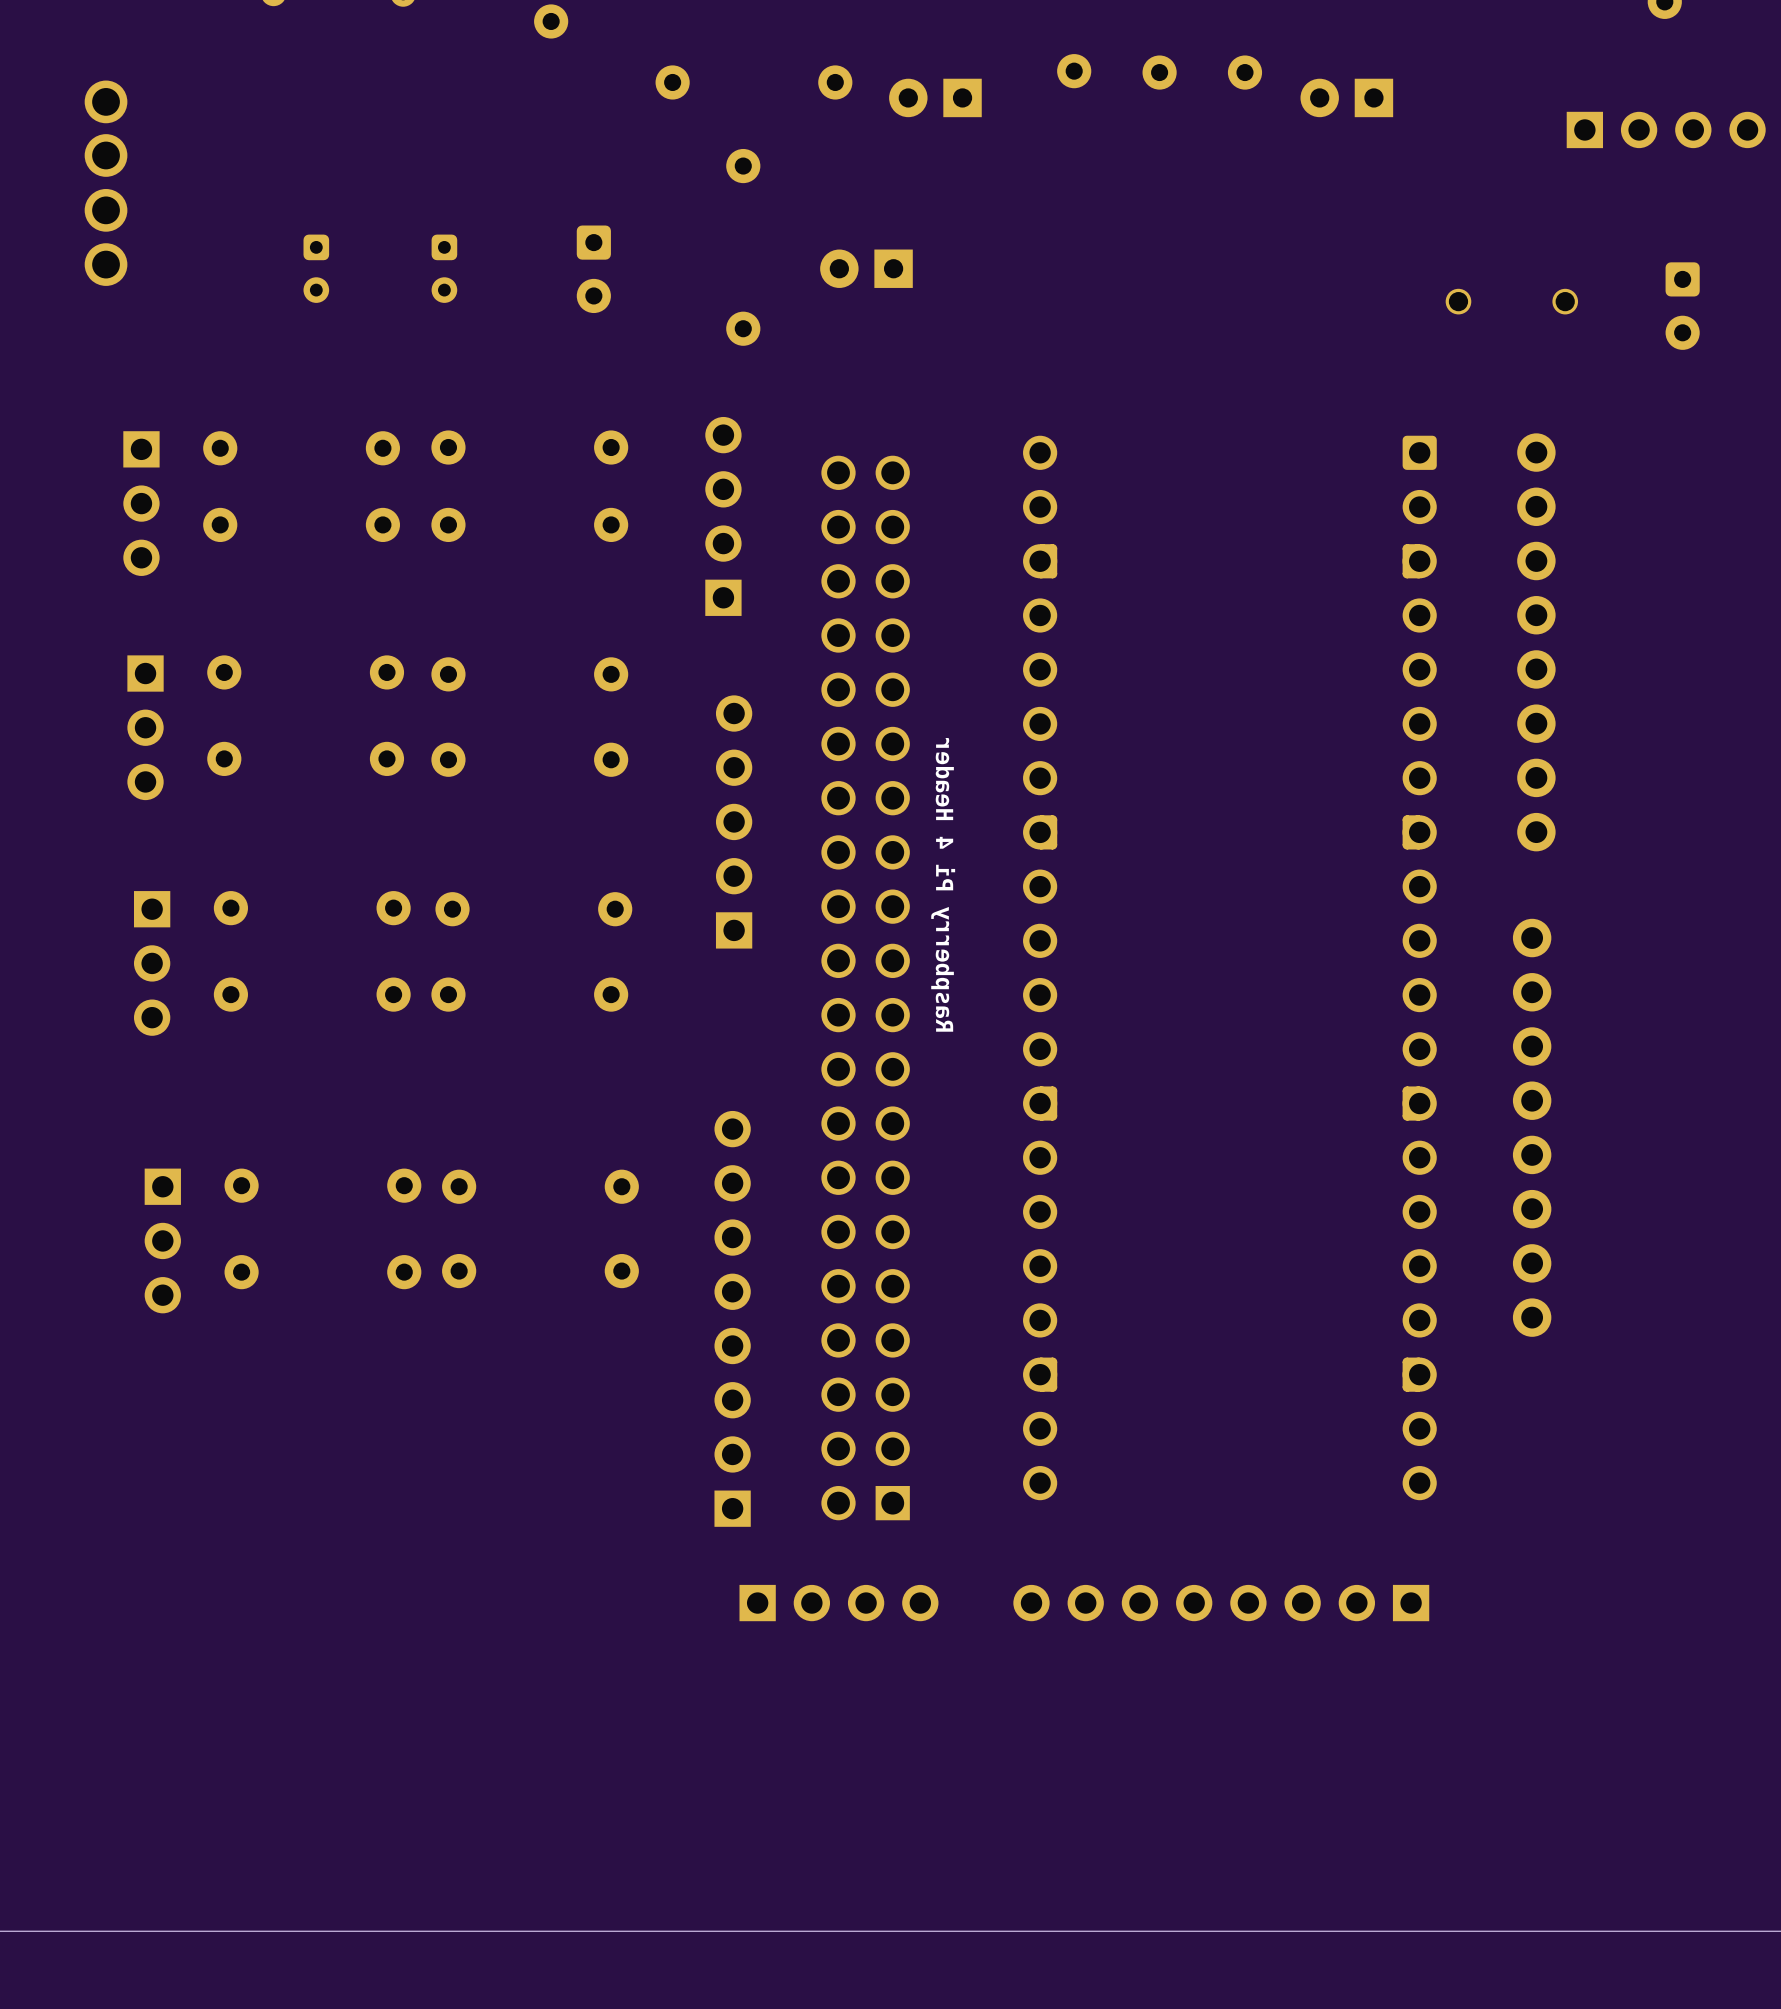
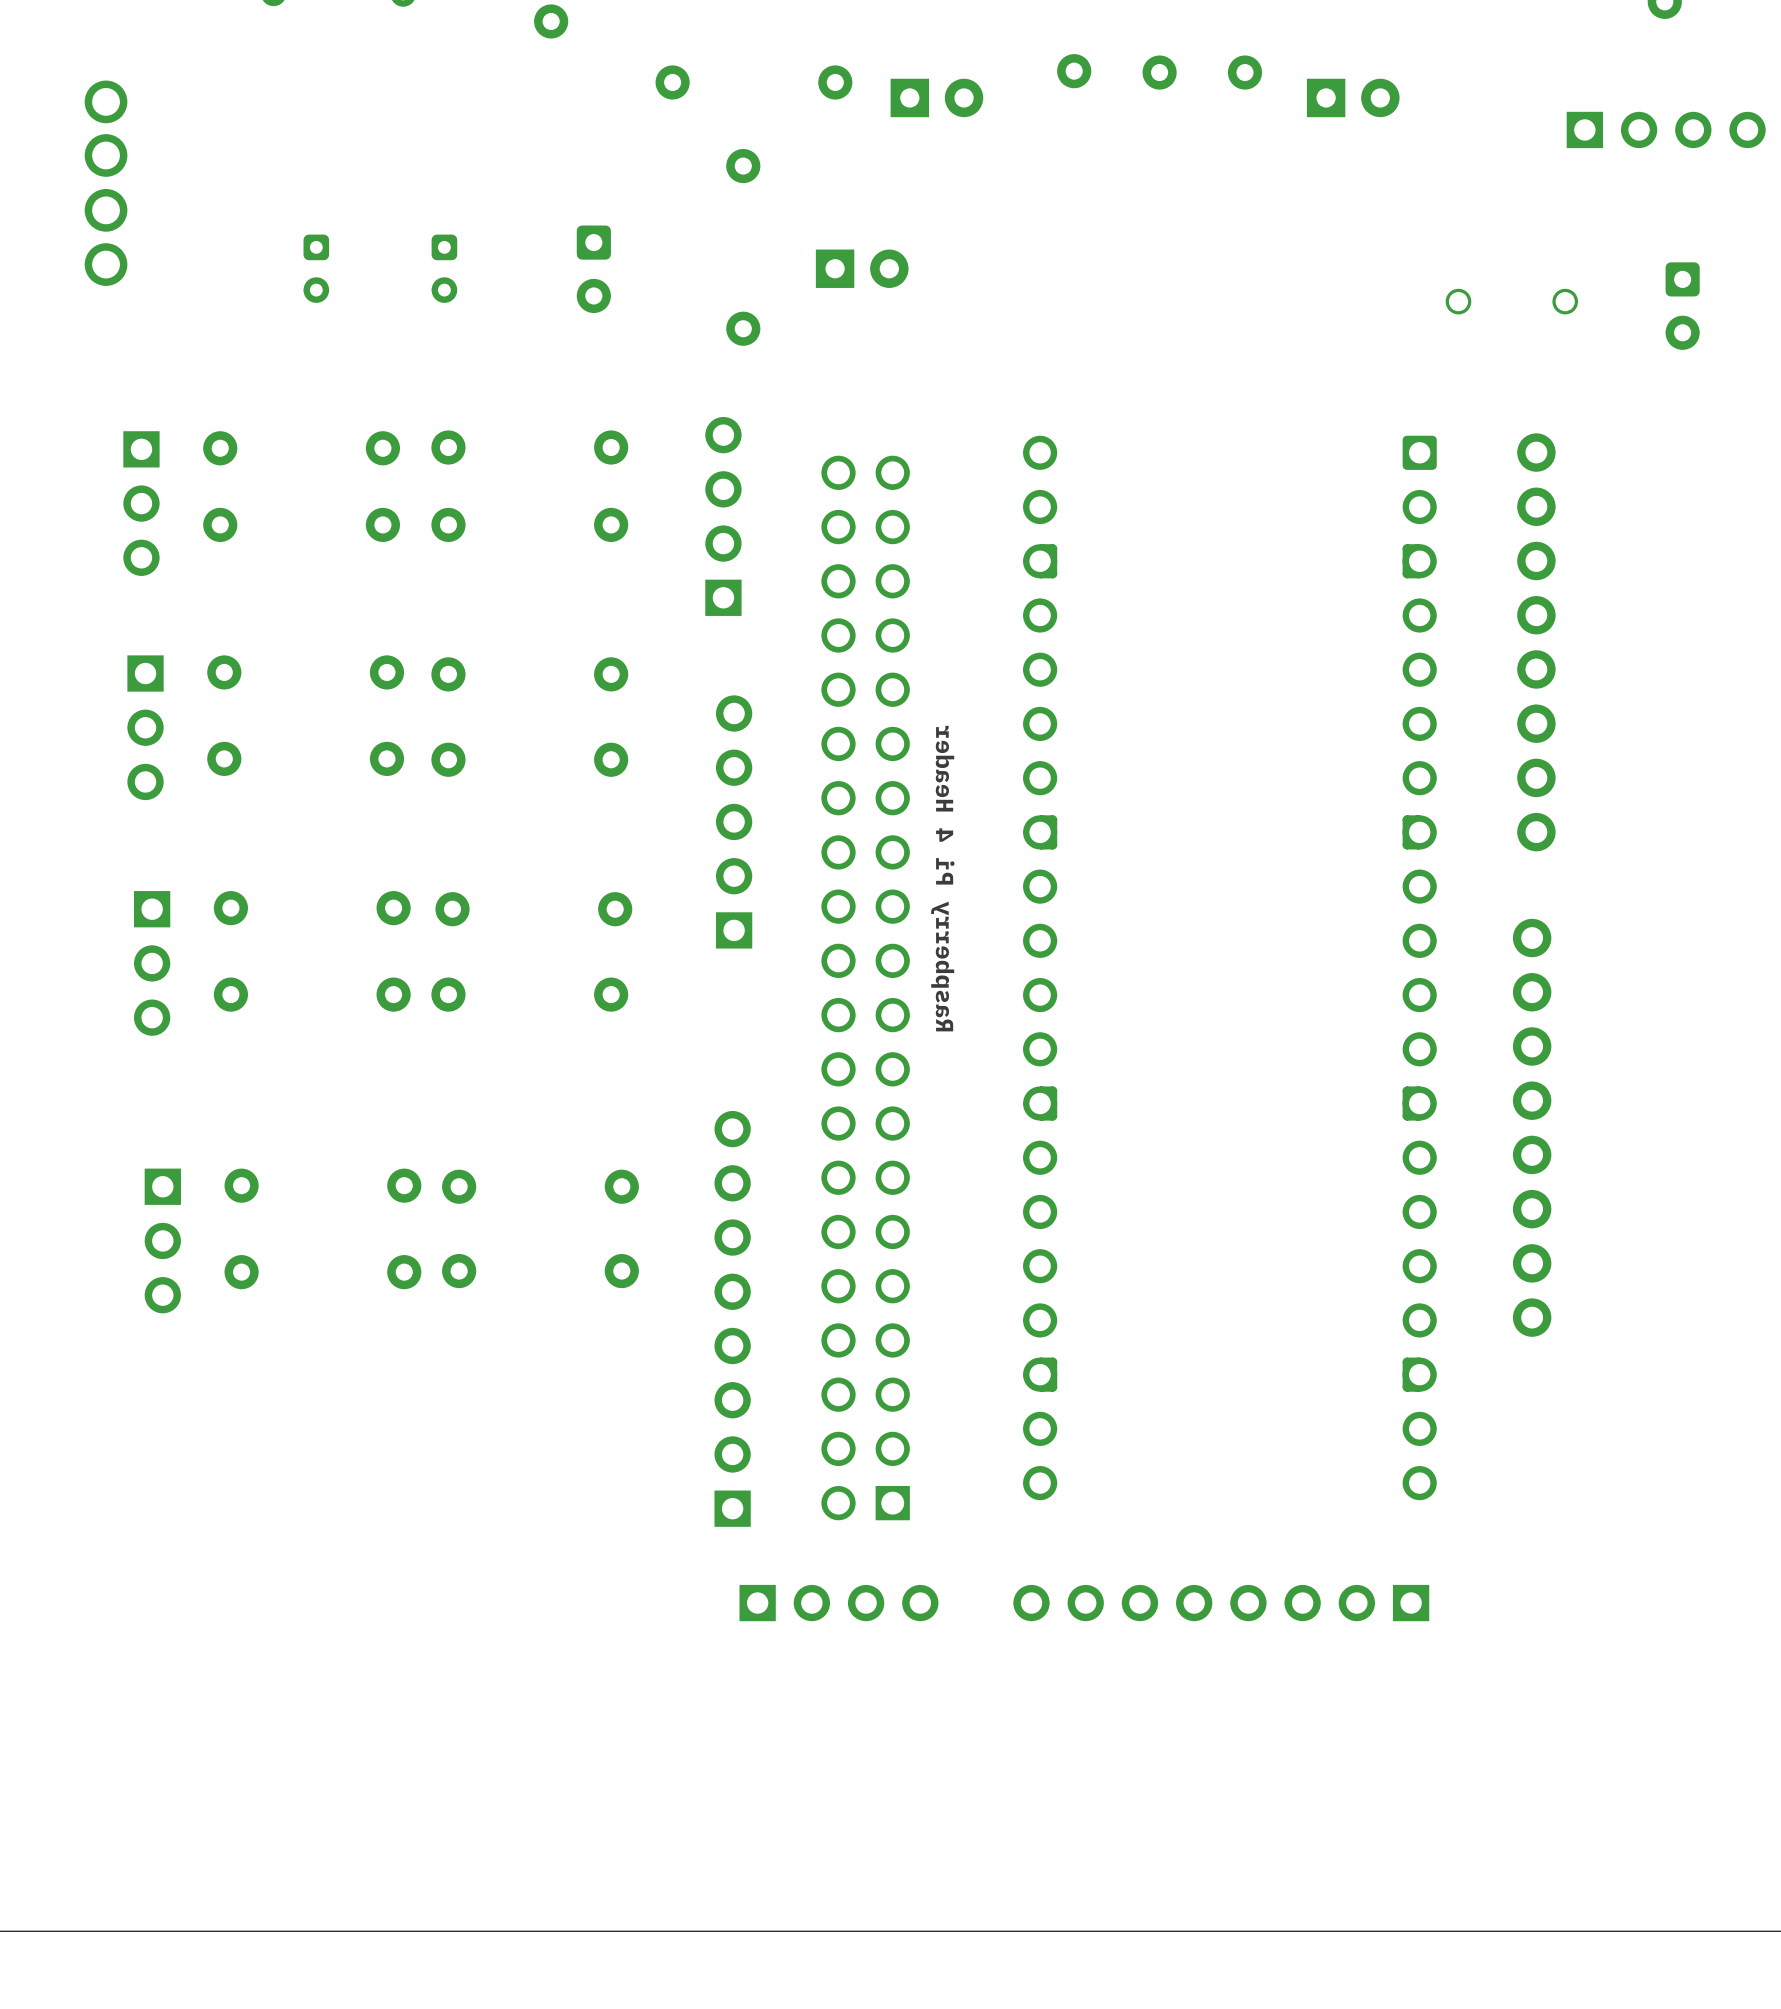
part rotation: 0° (935, 97) -> 180° (936, 97)
part rotation: 0° (1346, 97) -> 180° (1353, 97)
part rotation: 0° (866, 268) -> 180° (862, 268)

